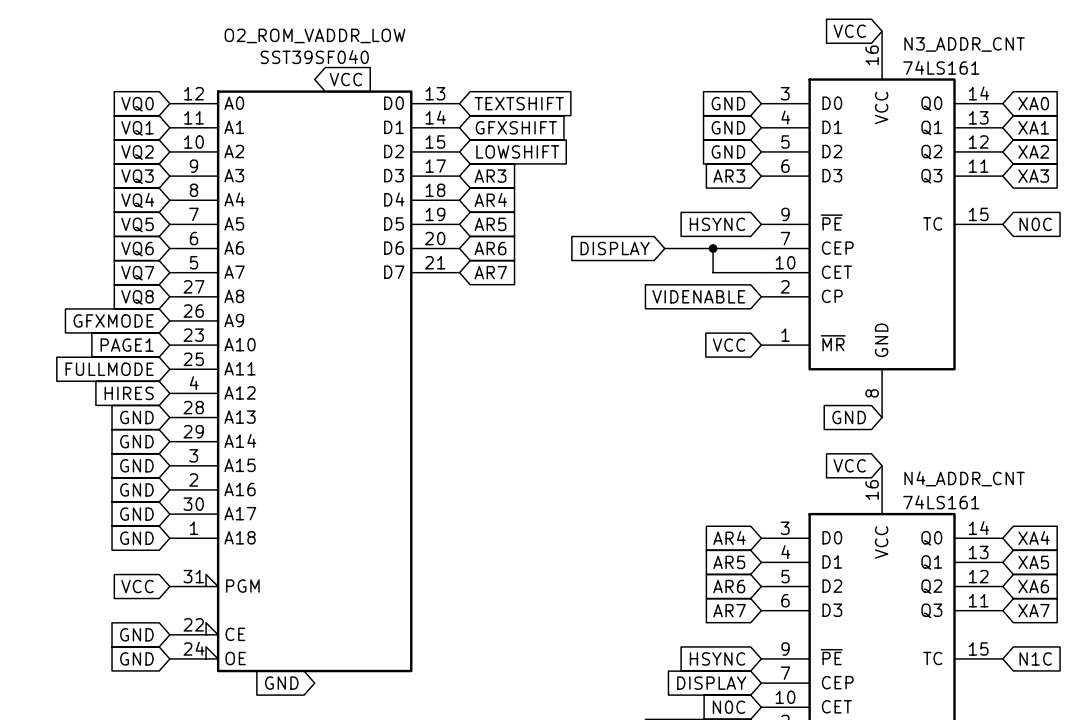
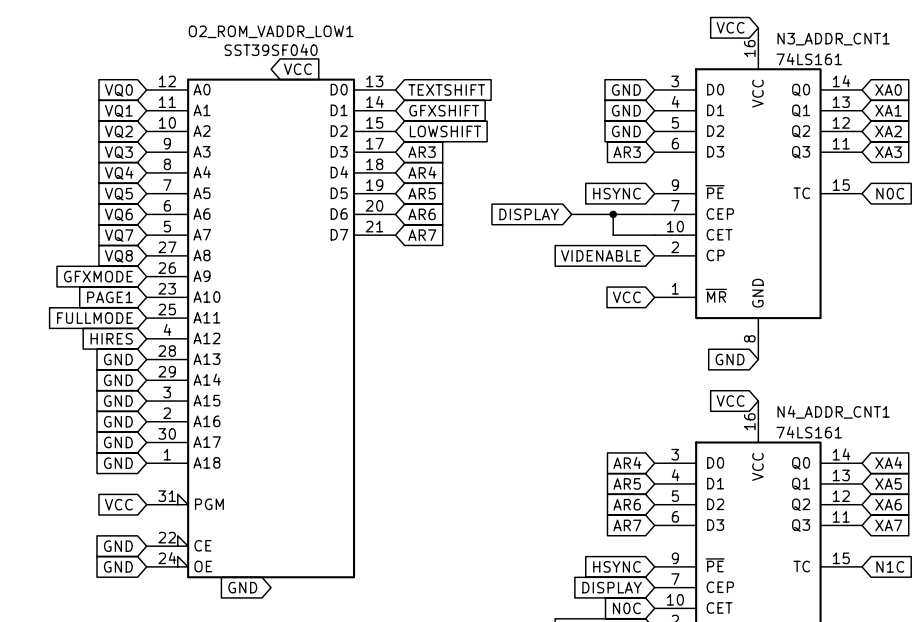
O2_ROM_VADDR_LOW name: O2_ROM_VADDR_LOW (314, 35) -> O2_ROM_VADDR_LOW1 (271, 31)
N3_ADDR_CNT name: N3_ADDR_CNT (964, 44) -> N3_ADDR_CNT1 (833, 39)
N4_ADDR_CNT name: N4_ADDR_CNT (964, 478) -> N4_ADDR_CNT1 (833, 412)

